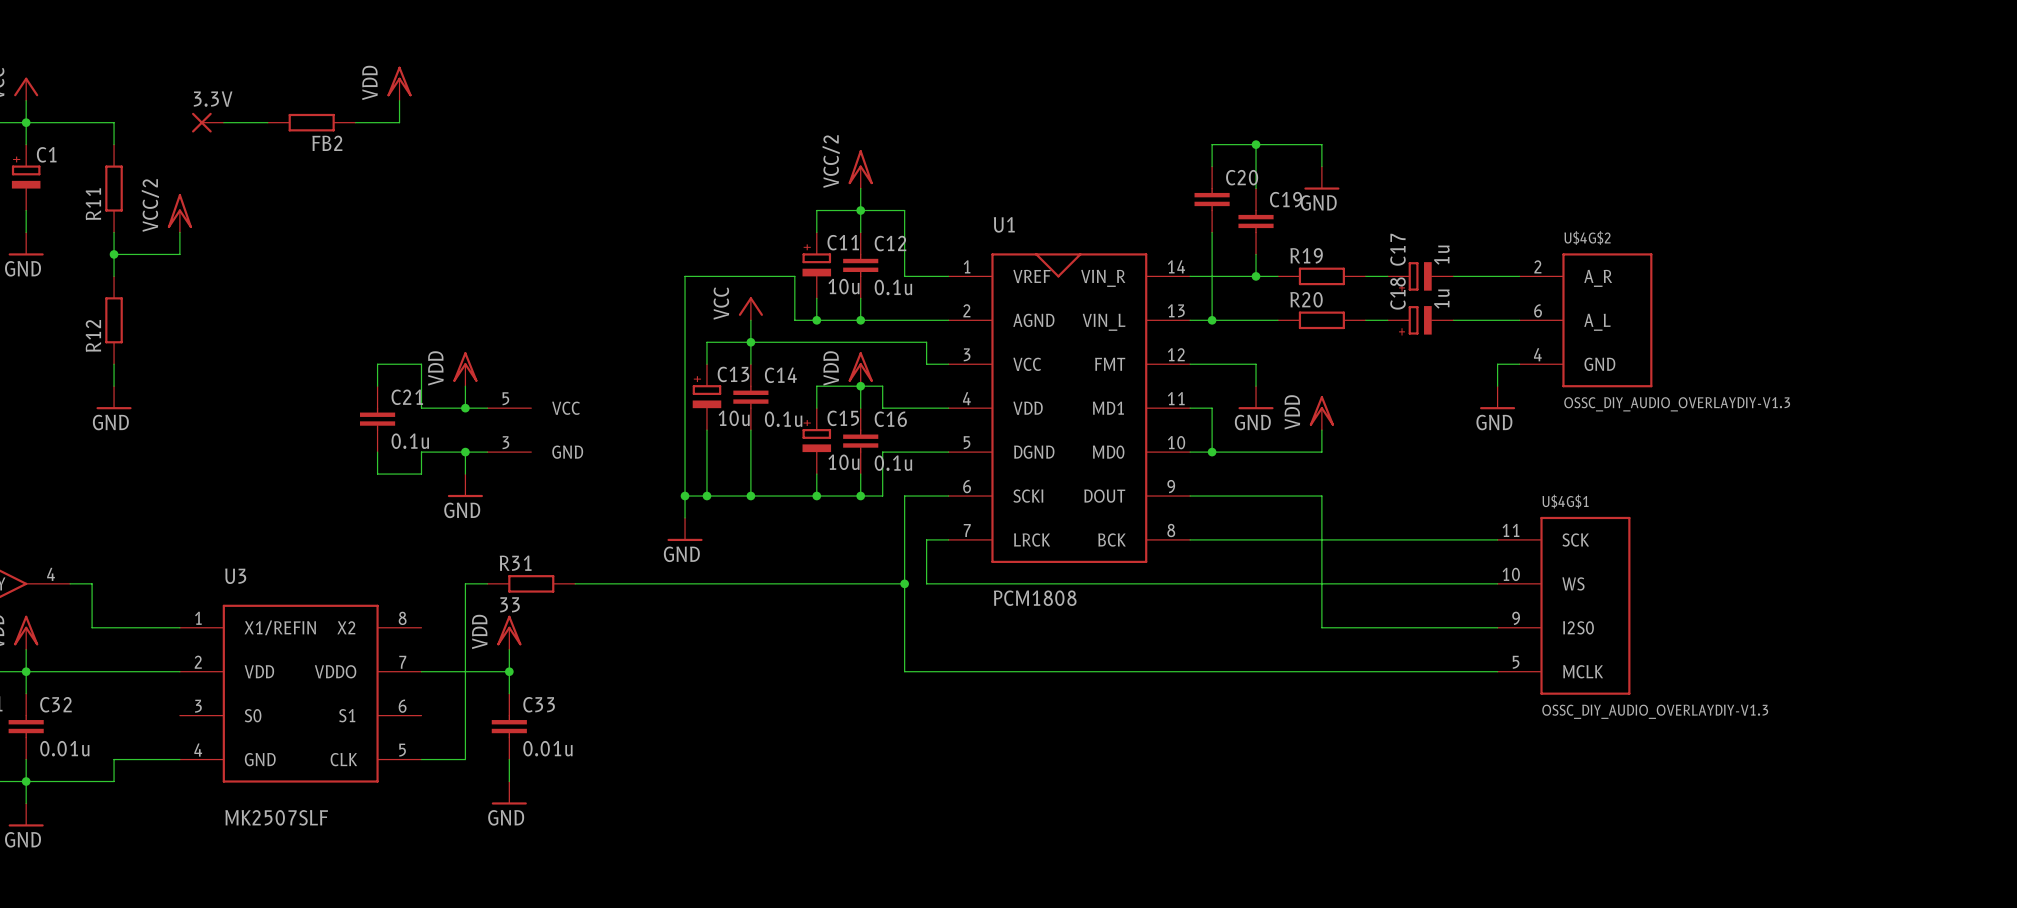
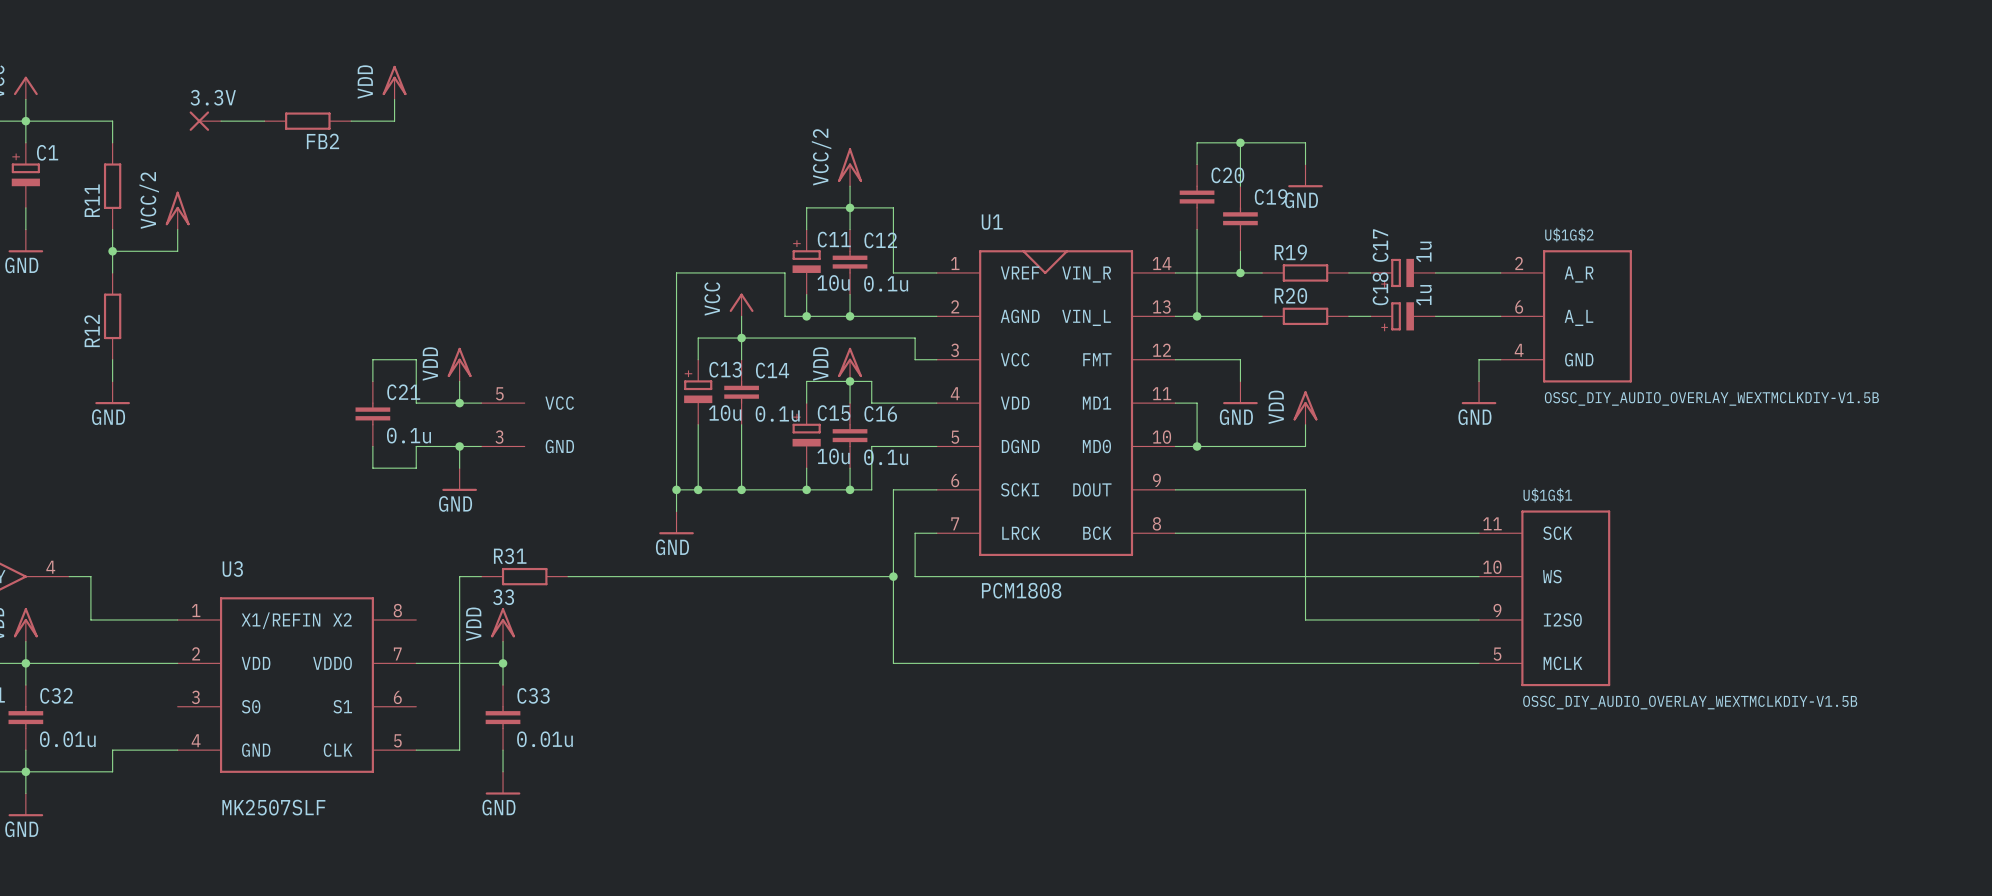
U$4G$2 name: U$4G$2 (1587, 237) -> U$1G$2 (1569, 235)
U$4G$2 value: OSSC_DIY_AUDIO_OVERLAYDIY-V1.3 (1677, 404) -> OSSC_DIY_AUDIO_OVERLAY_WEXTMCLKDIY-V1.5B (1711, 398)
U$4G$1 name: U$4G$1 (1565, 501) -> U$1G$1 (1547, 495)
U$4G$1 value: OSSC_DIY_AUDIO_OVERLAYDIY-V1.3 (1655, 711) -> OSSC_DIY_AUDIO_OVERLAY_WEXTMCLKDIY-V1.5B (1690, 702)

